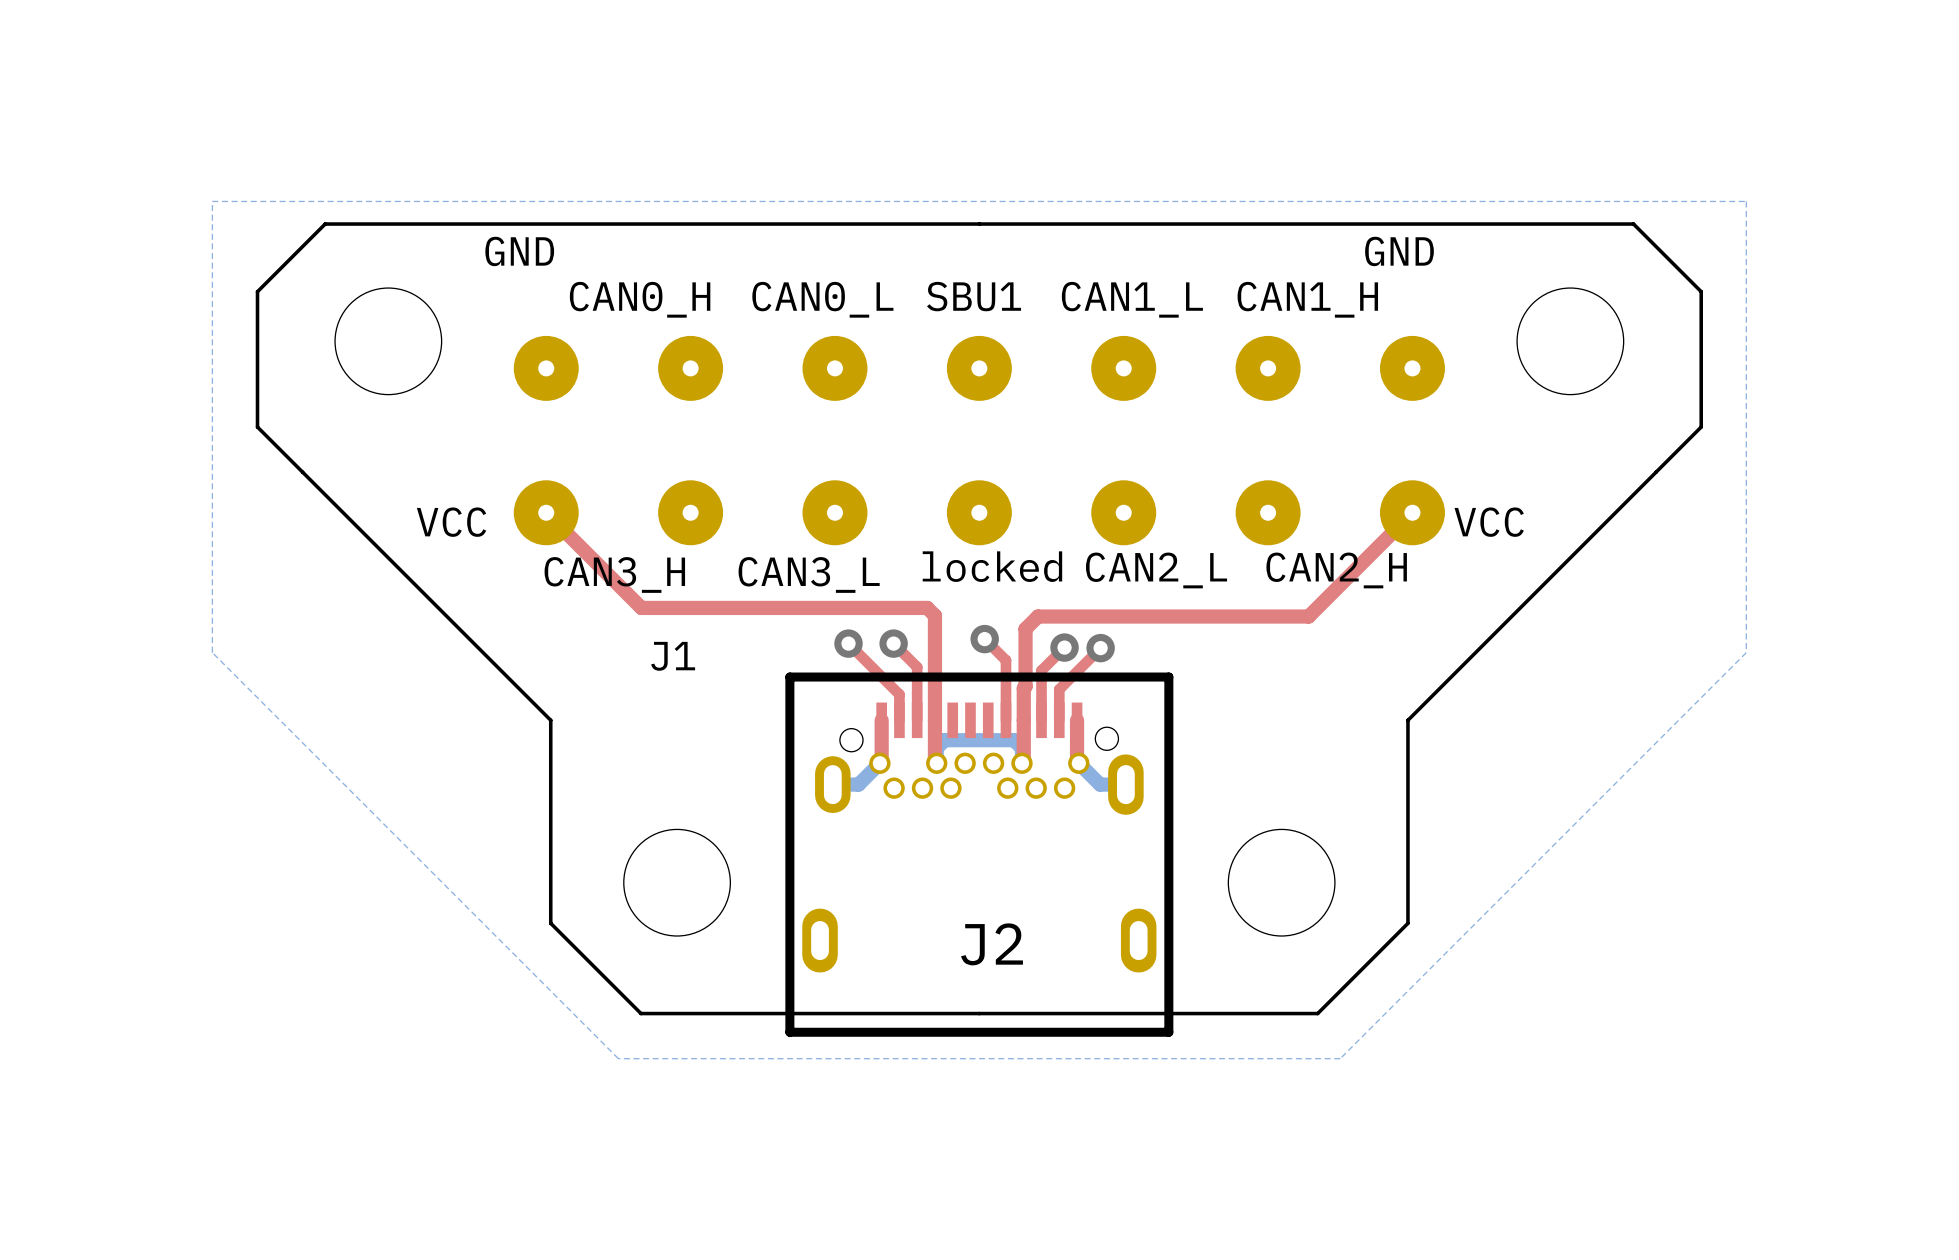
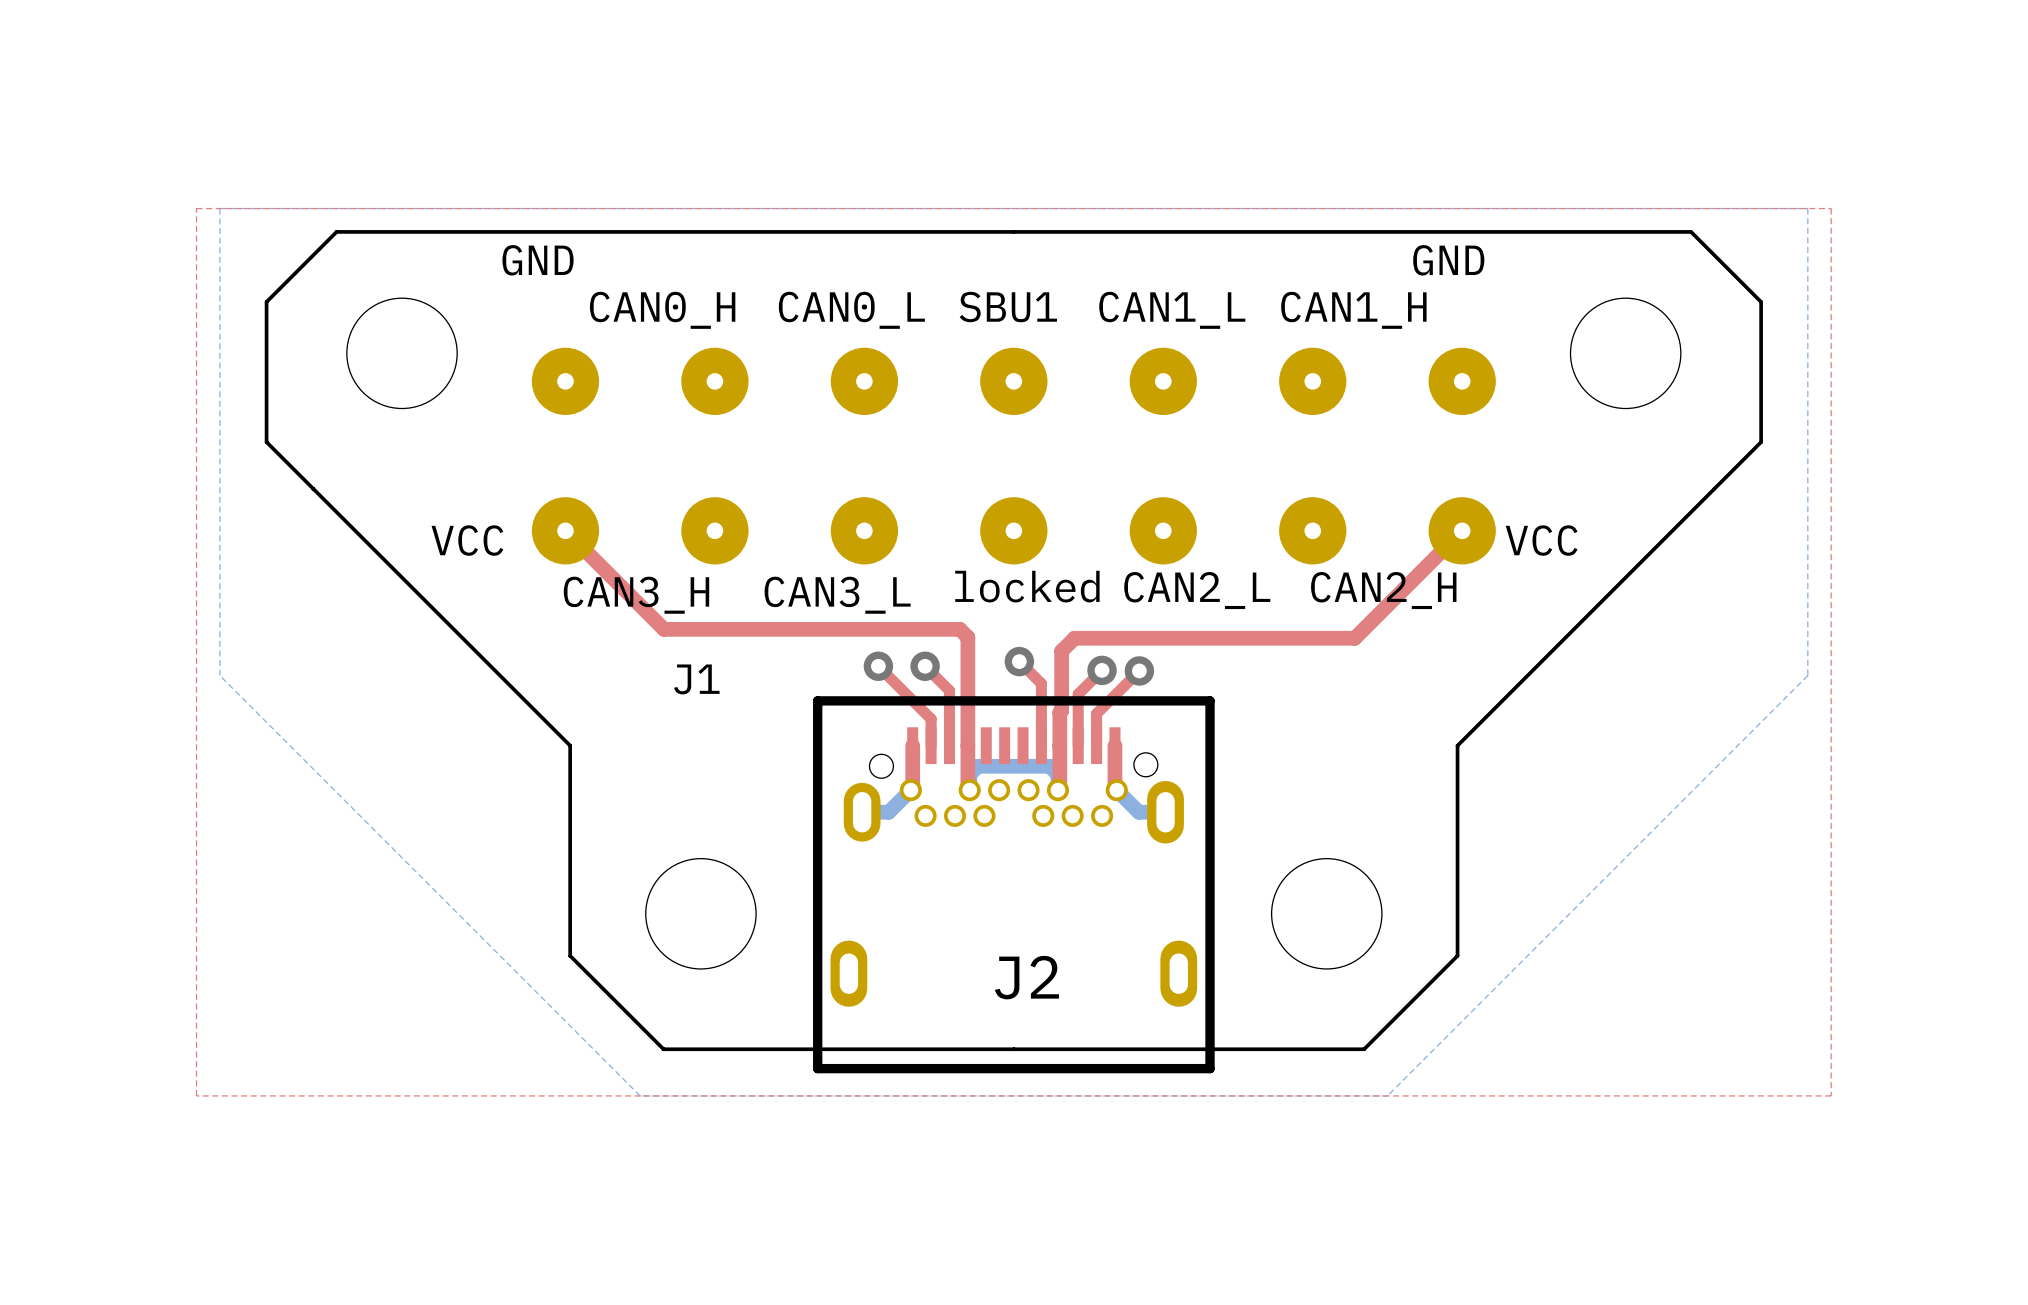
top zone outline: none -> (196, 208) (1831, 208) (1831, 1095) (196, 1095) (196, 208)

